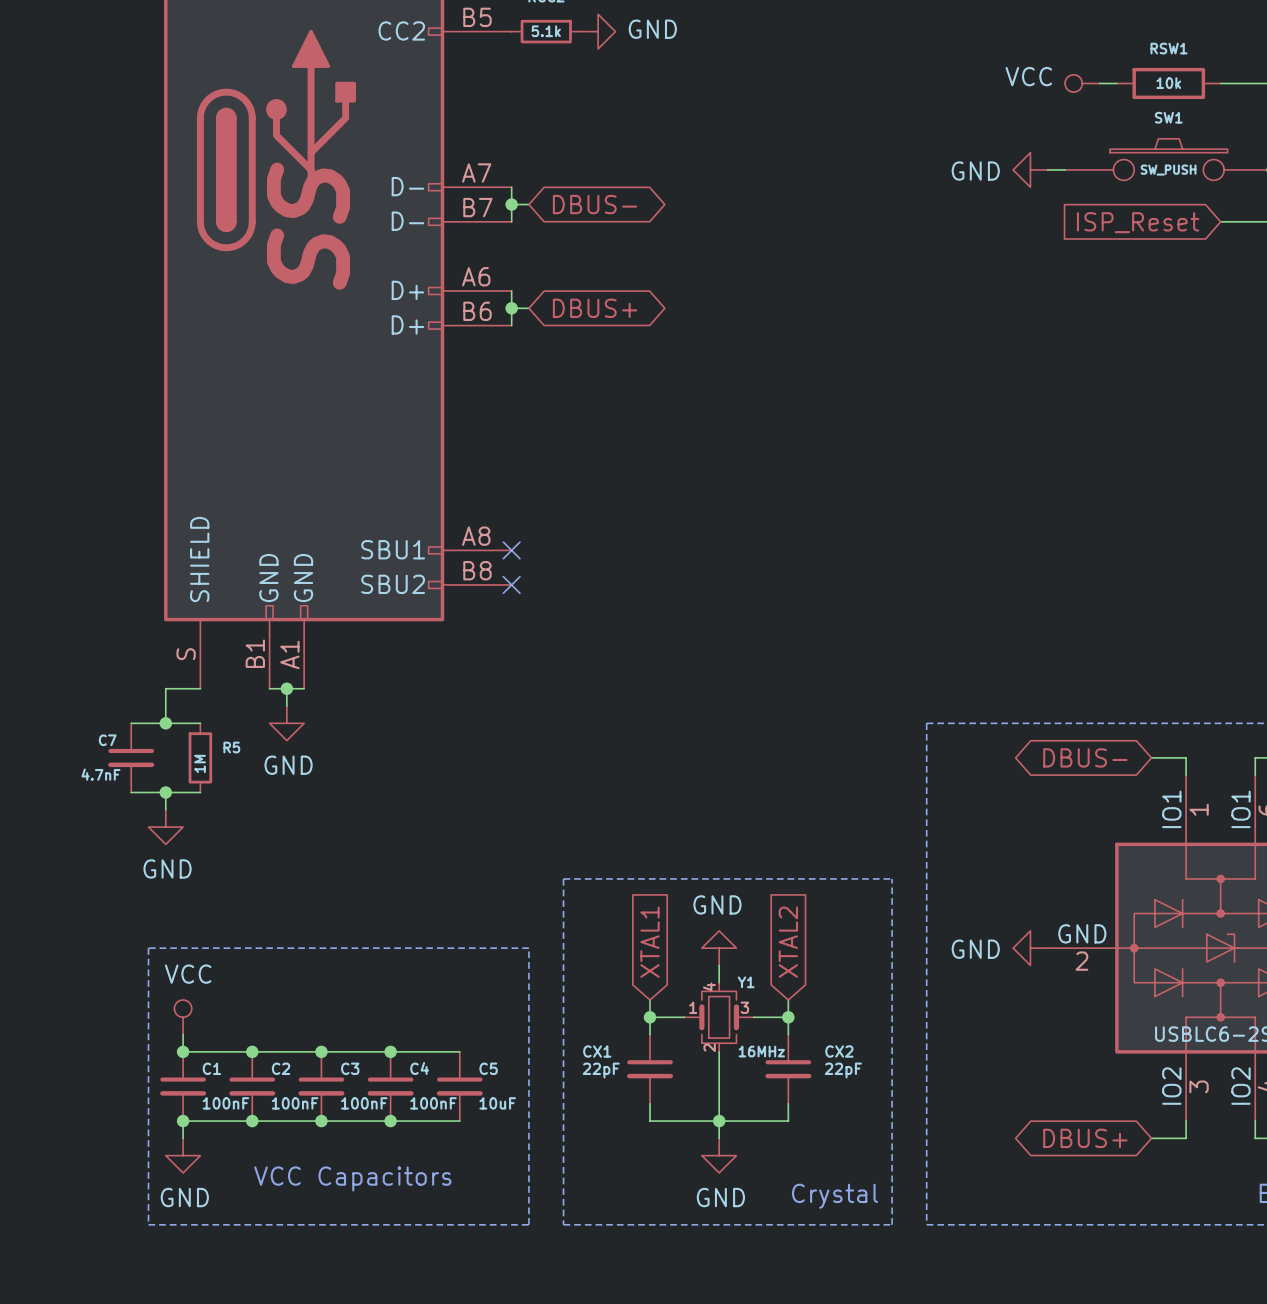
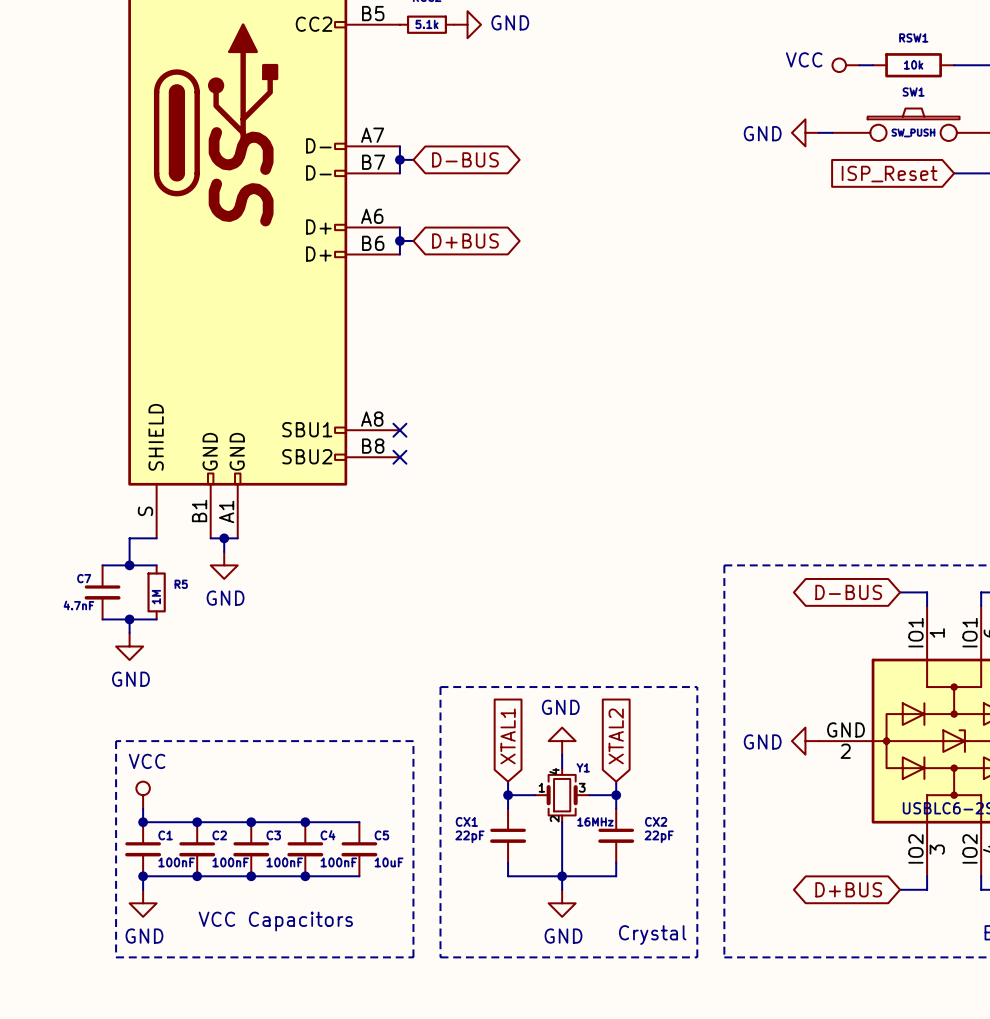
global label: DBUS- (595, 204) -> D-BUS (465, 159)
global label: DBUS+ (595, 308) -> D+BUS (465, 240)
global label: DBUS- (1085, 757) -> D-BUS (848, 592)
global label: DBUS+ (1085, 1138) -> D+BUS (848, 889)

